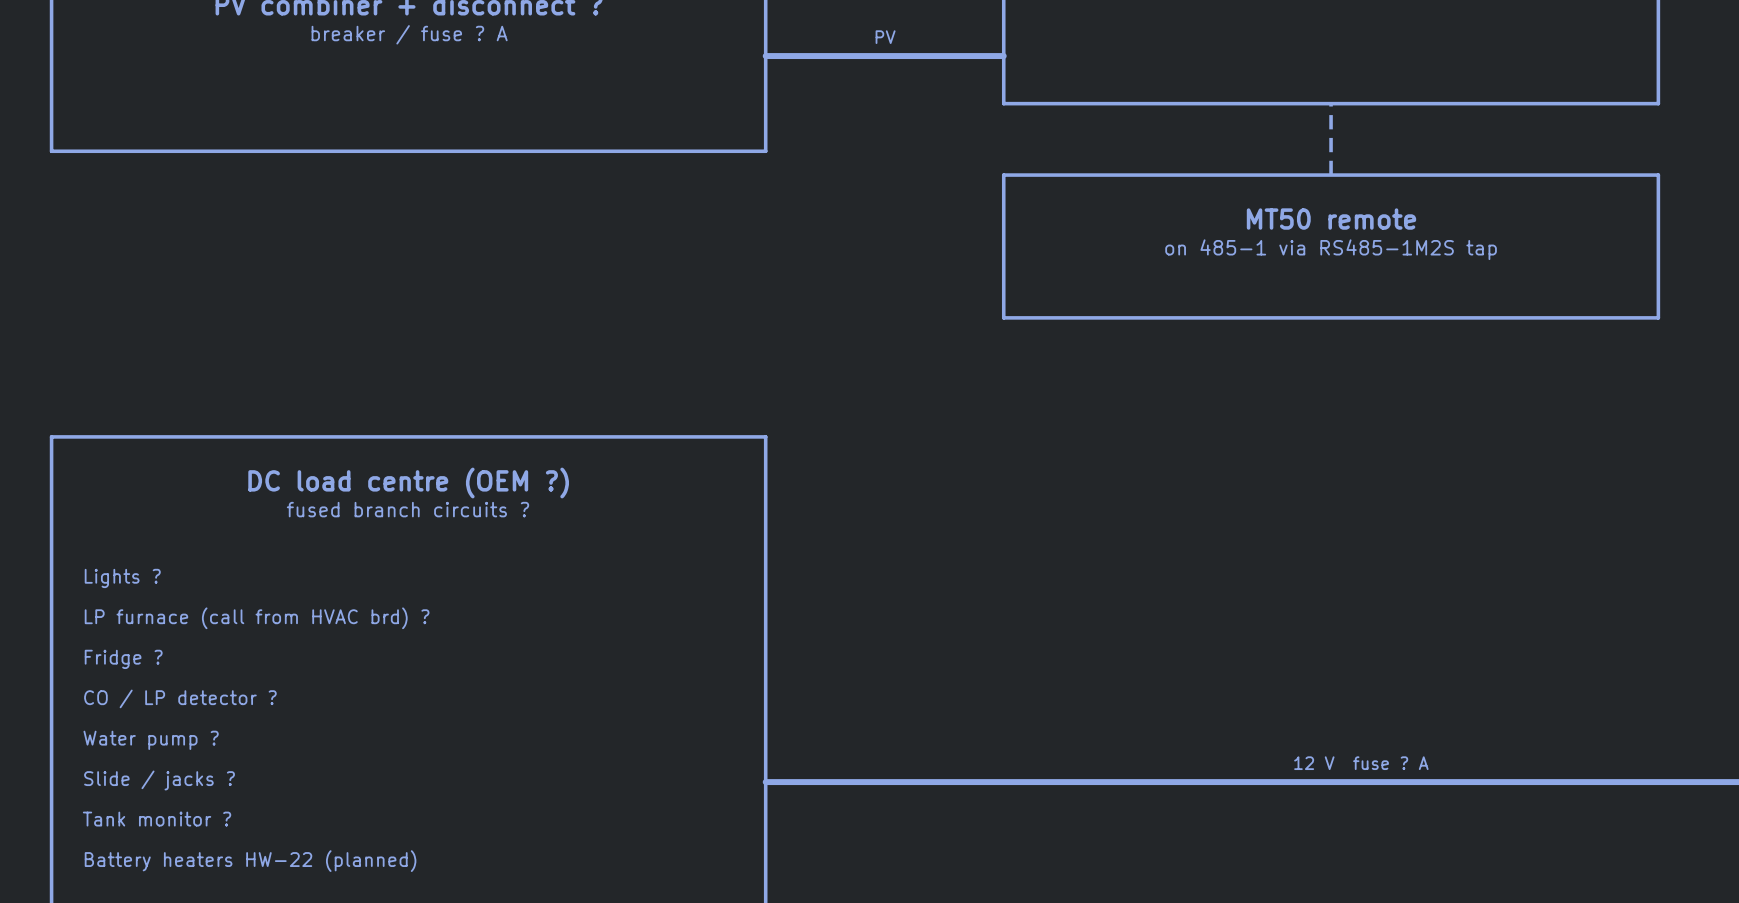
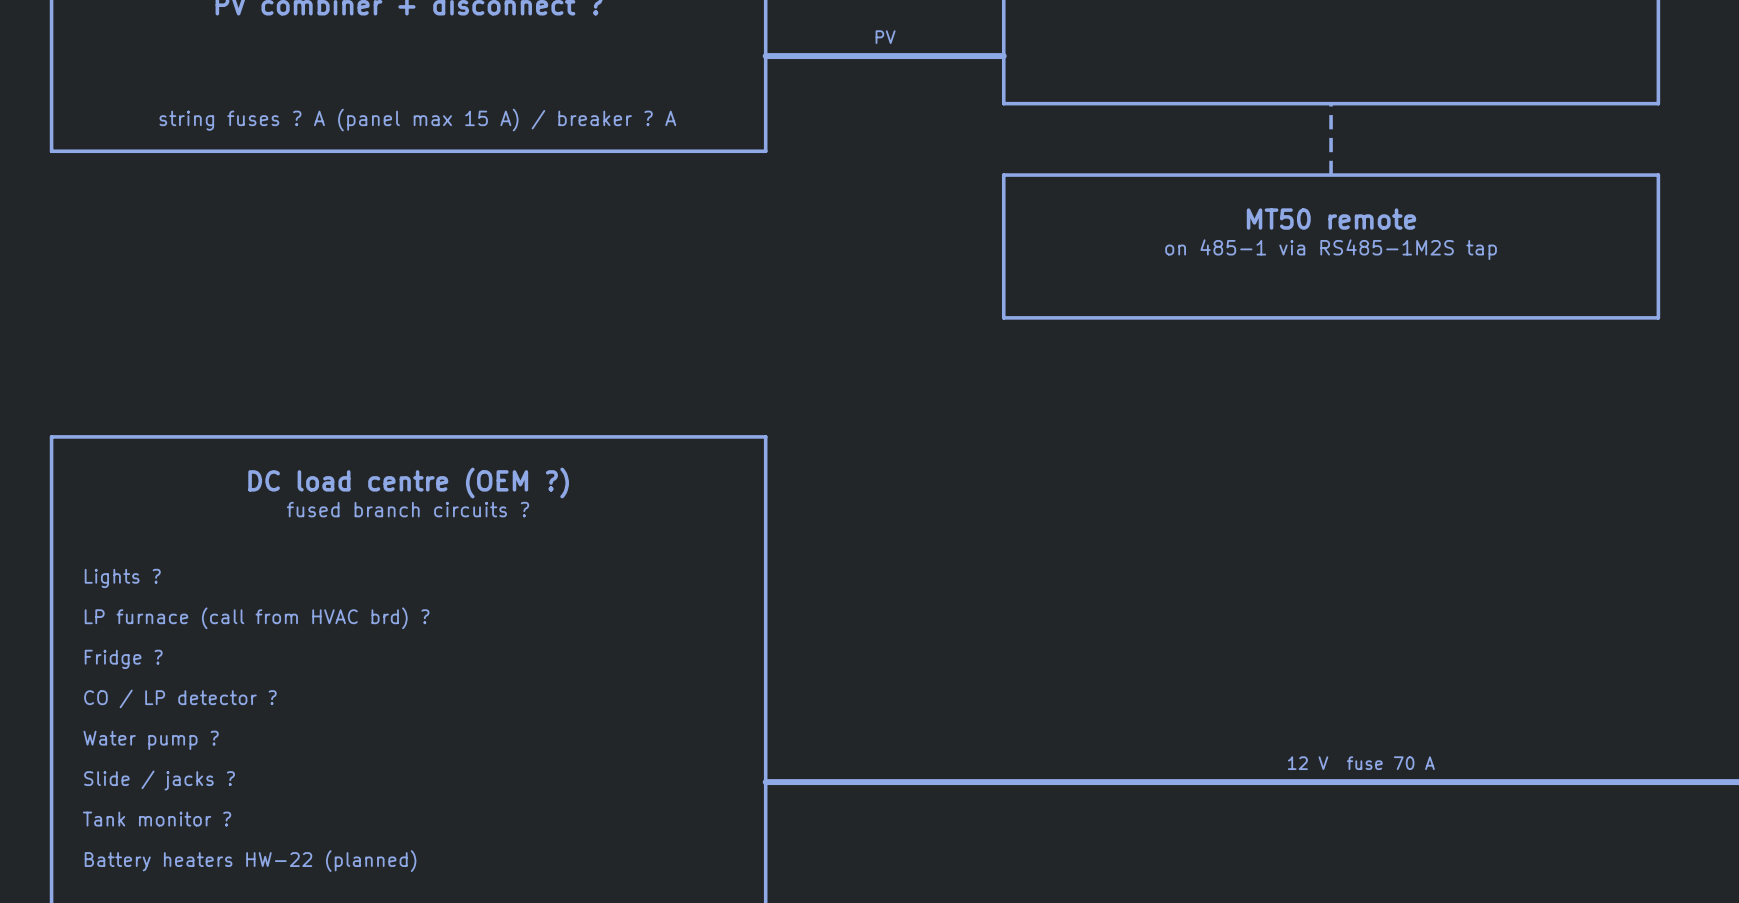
text: breaker / fuse ? A (409, 34) -> none
text: none -> string fuses ? A (panel max 15 A) / breaker ? A (417, 120)
text: 12 V fuse ? A (1361, 763) -> 12 V fuse 70 A (1361, 763)

